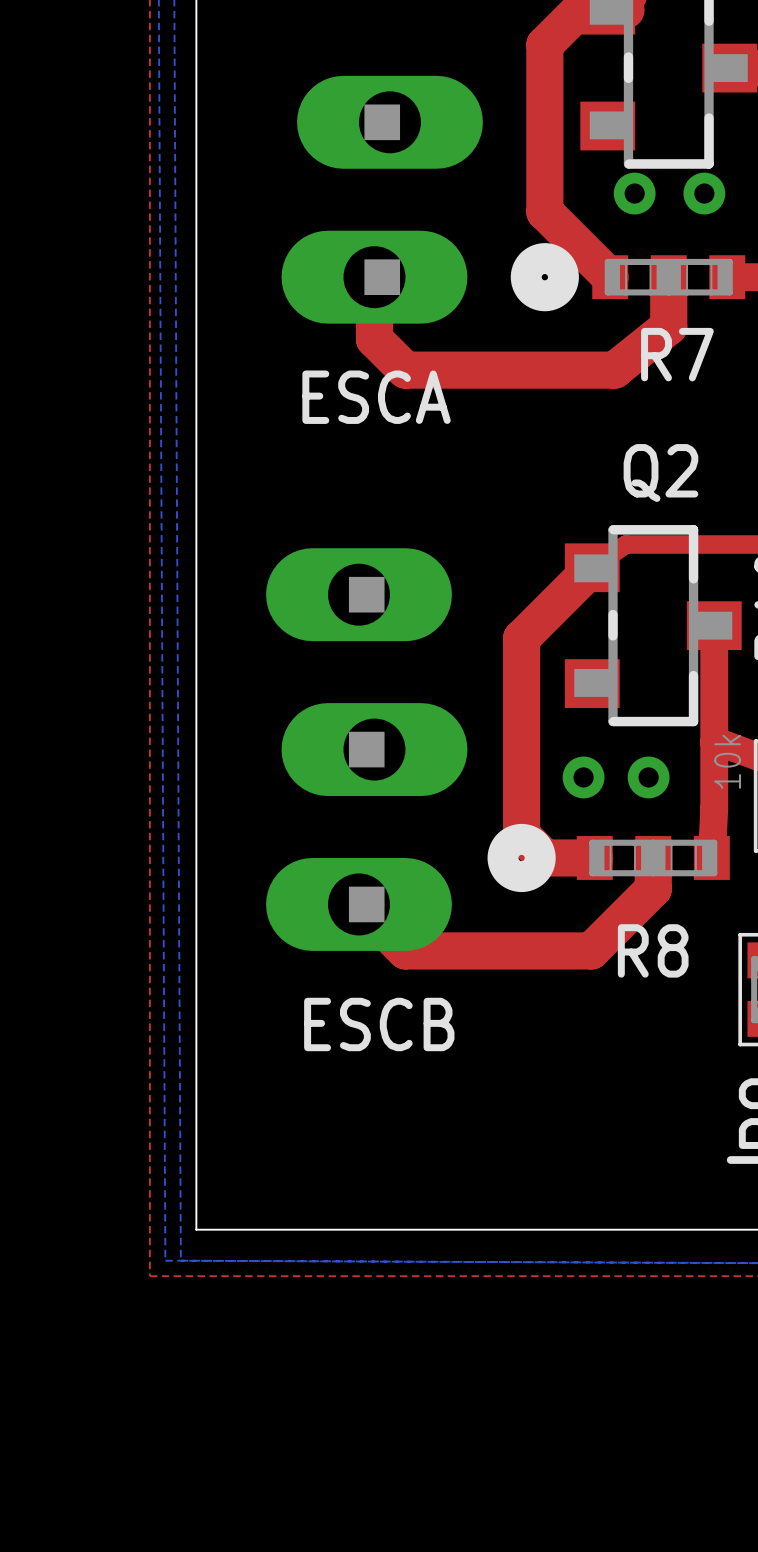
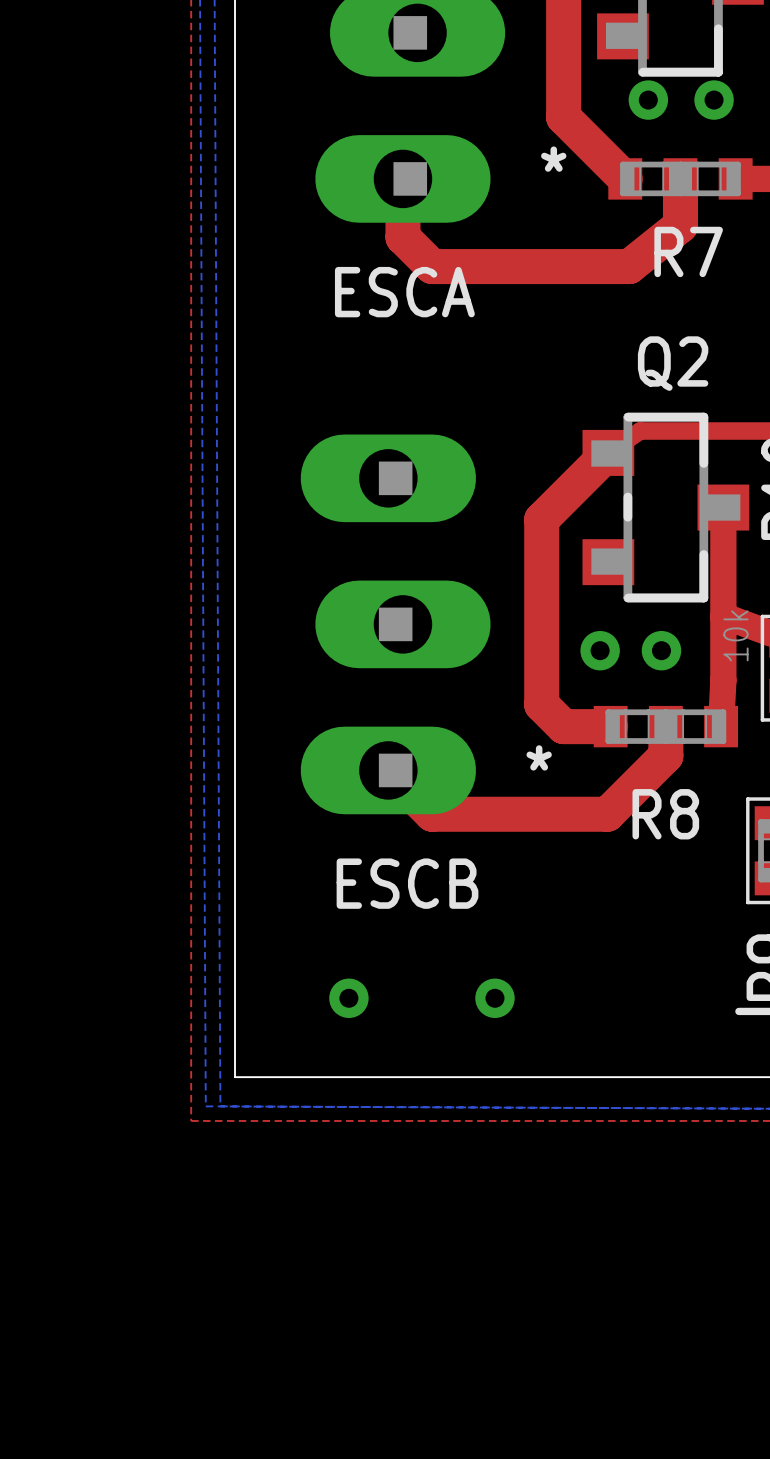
drawing: [510, 243, 579, 312] -> none
text: none -> * (553, 159)
drawing: [487, 823, 556, 893] -> none
text: none -> * (539, 757)
via: none -> (348, 998)
via: none -> (494, 998)

